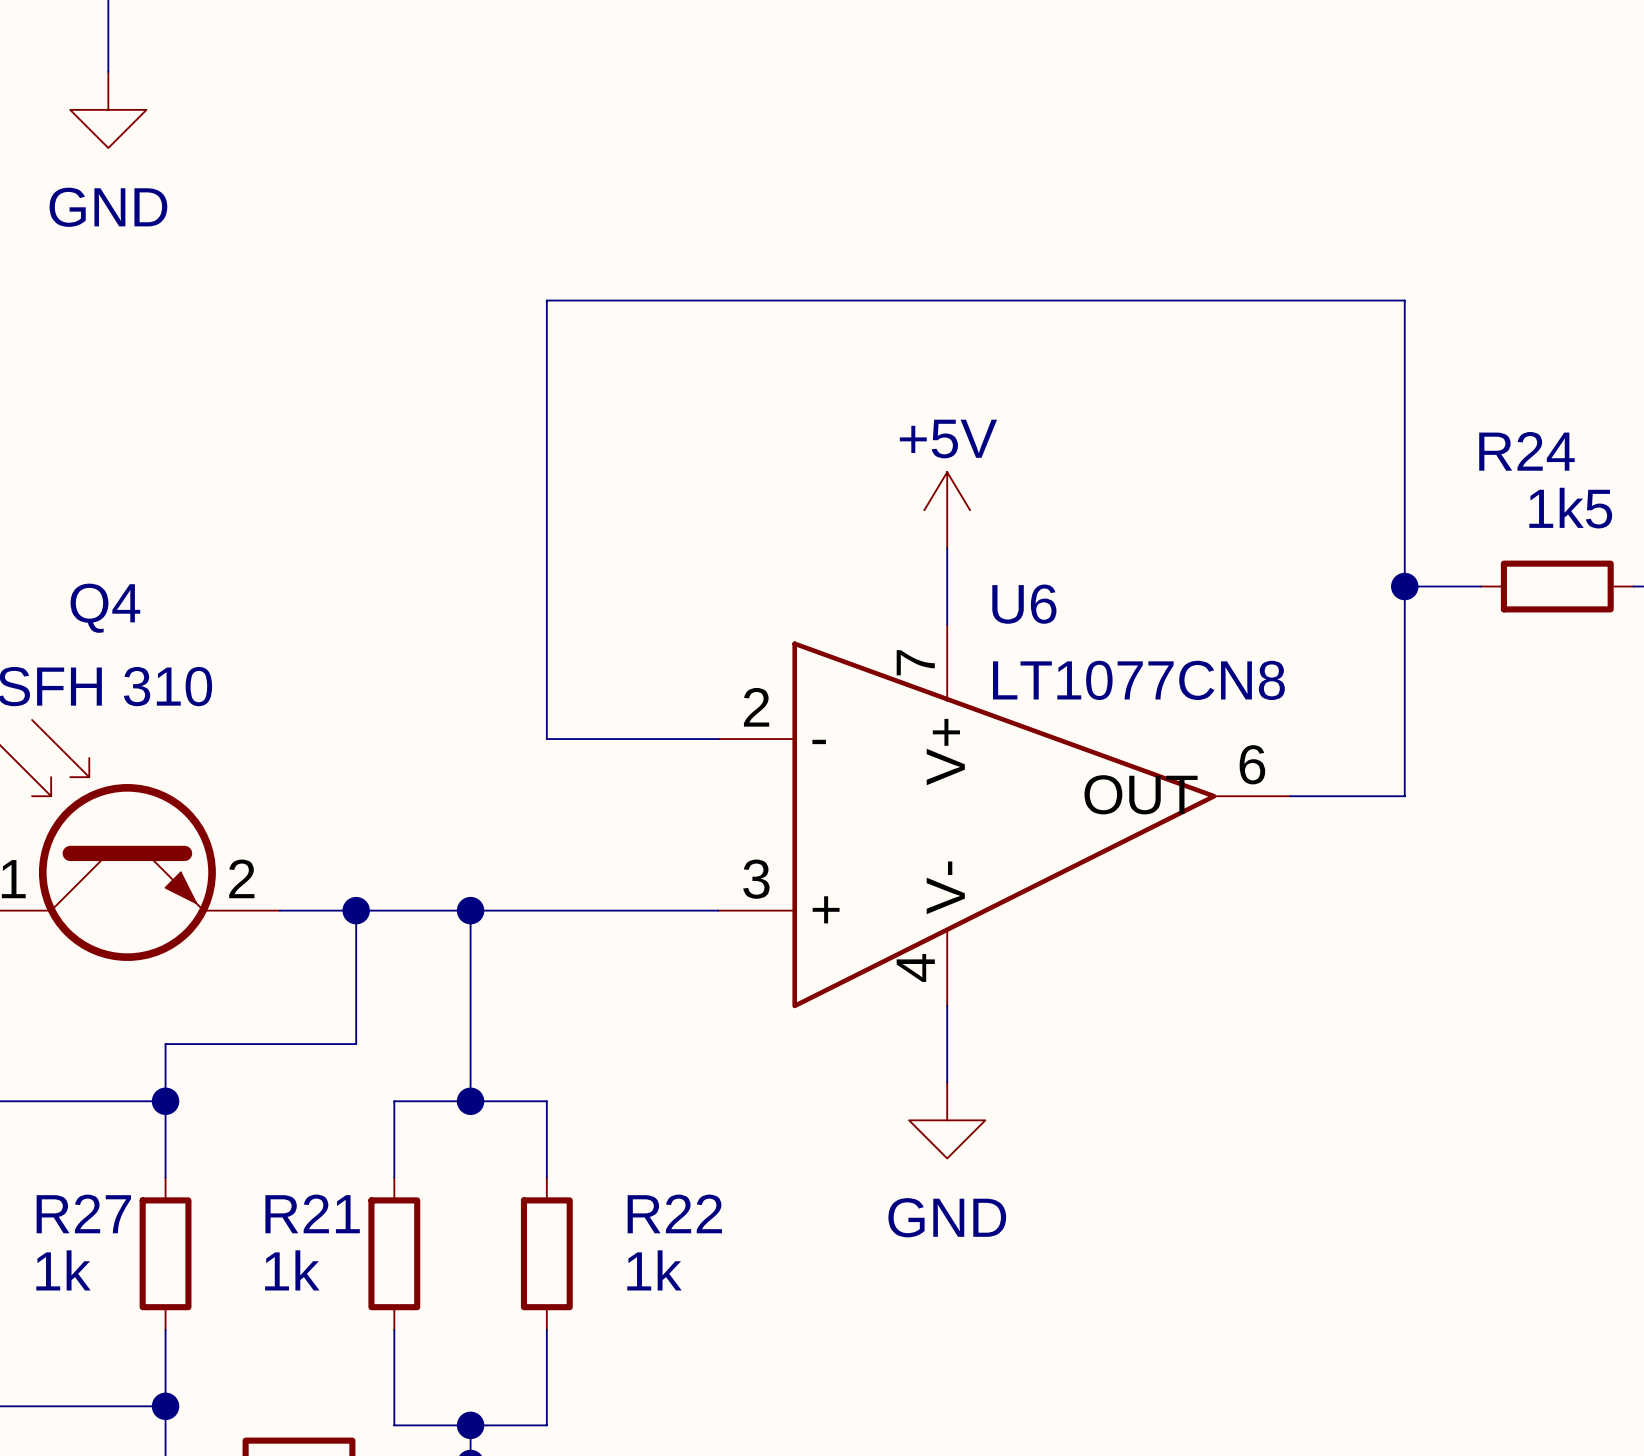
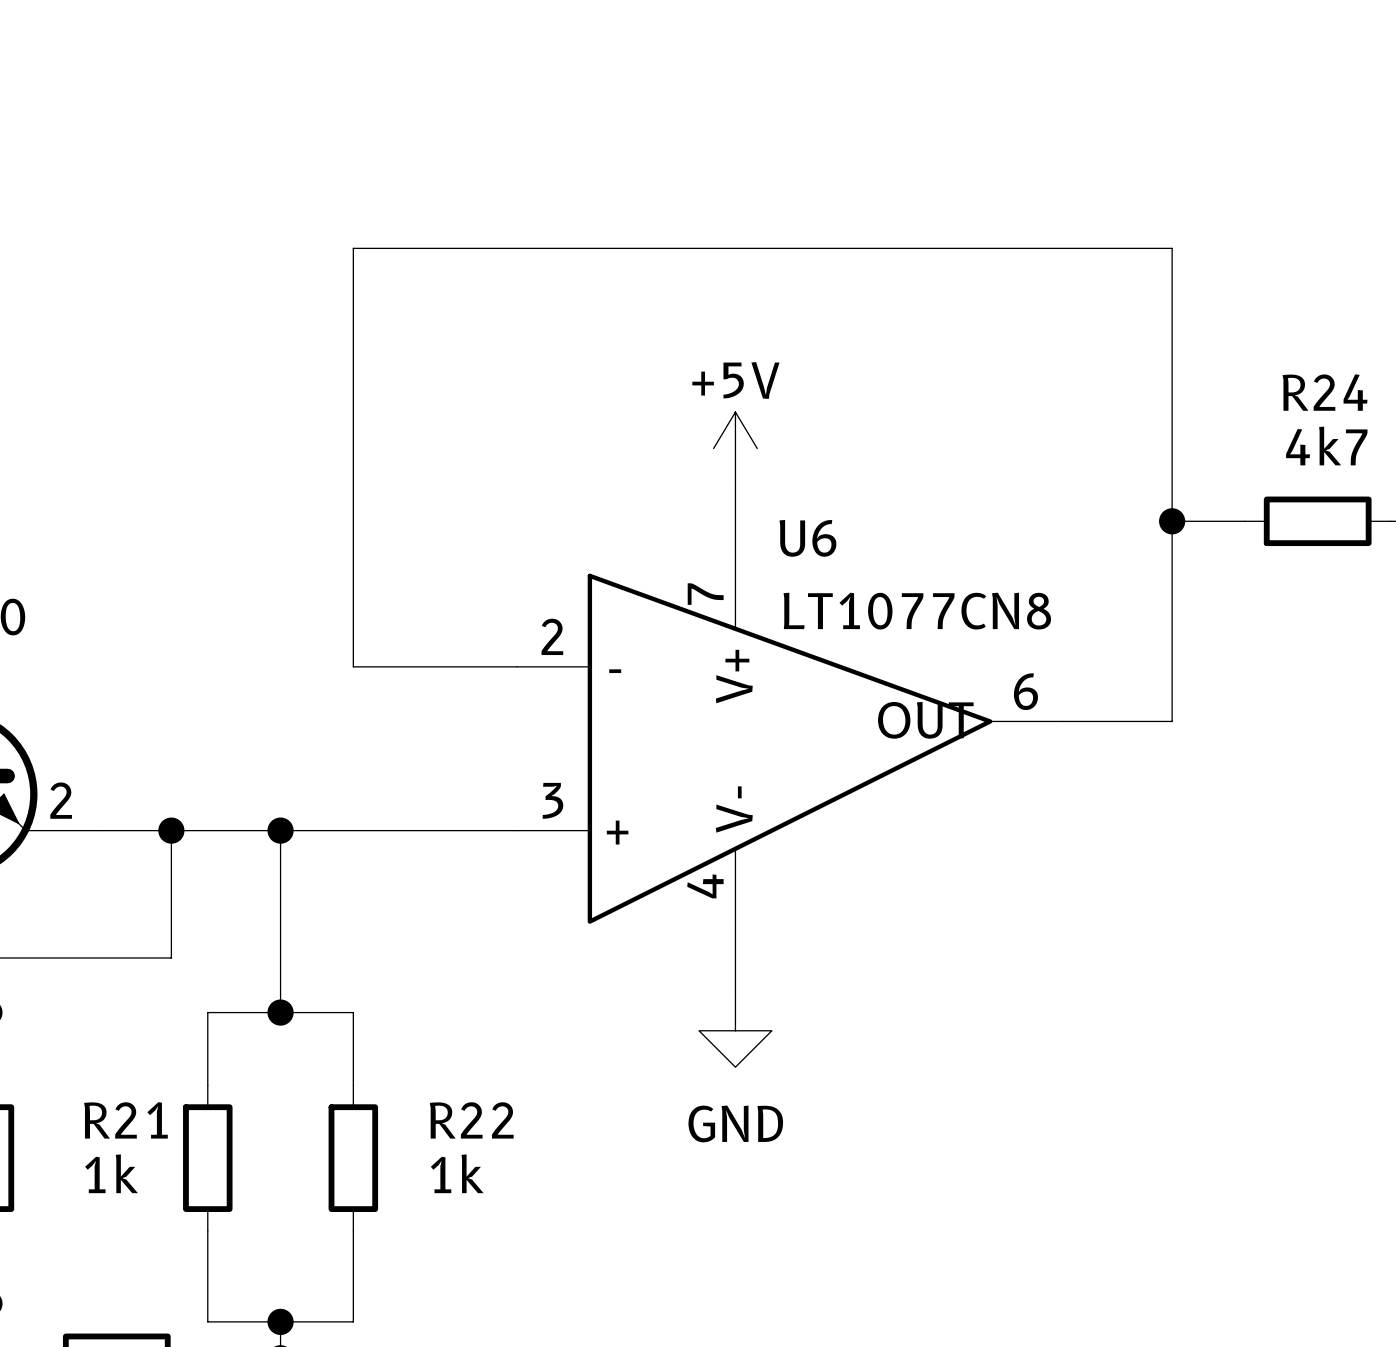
R24 name position: R24 (1526, 451) -> R24 (1325, 392)
R24 value: 1k5 (1570, 508) -> 4k7 (1326, 445)

